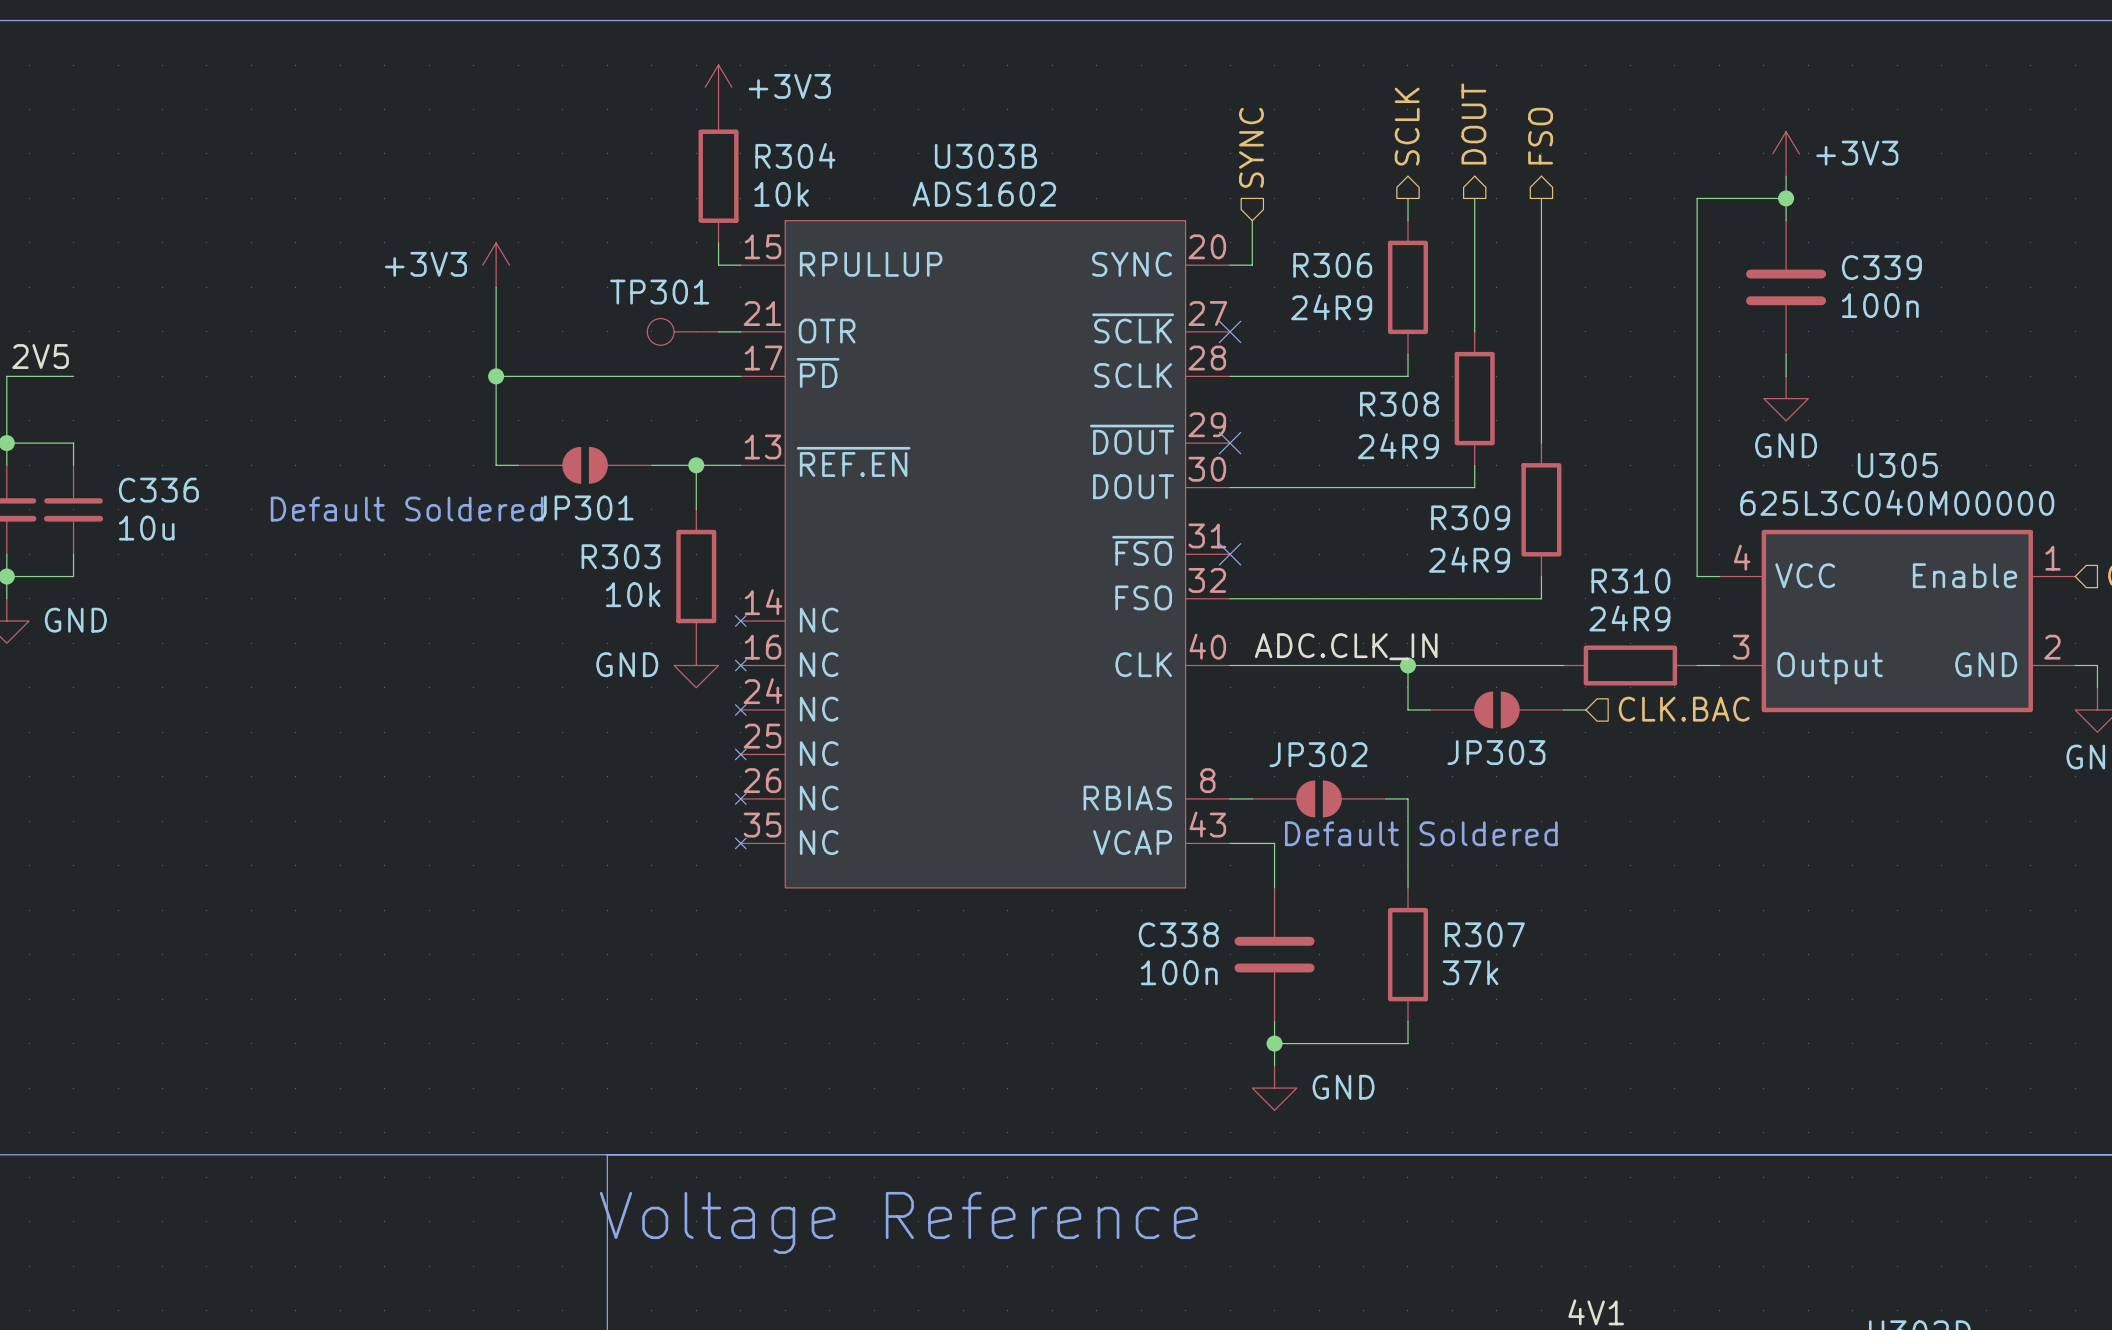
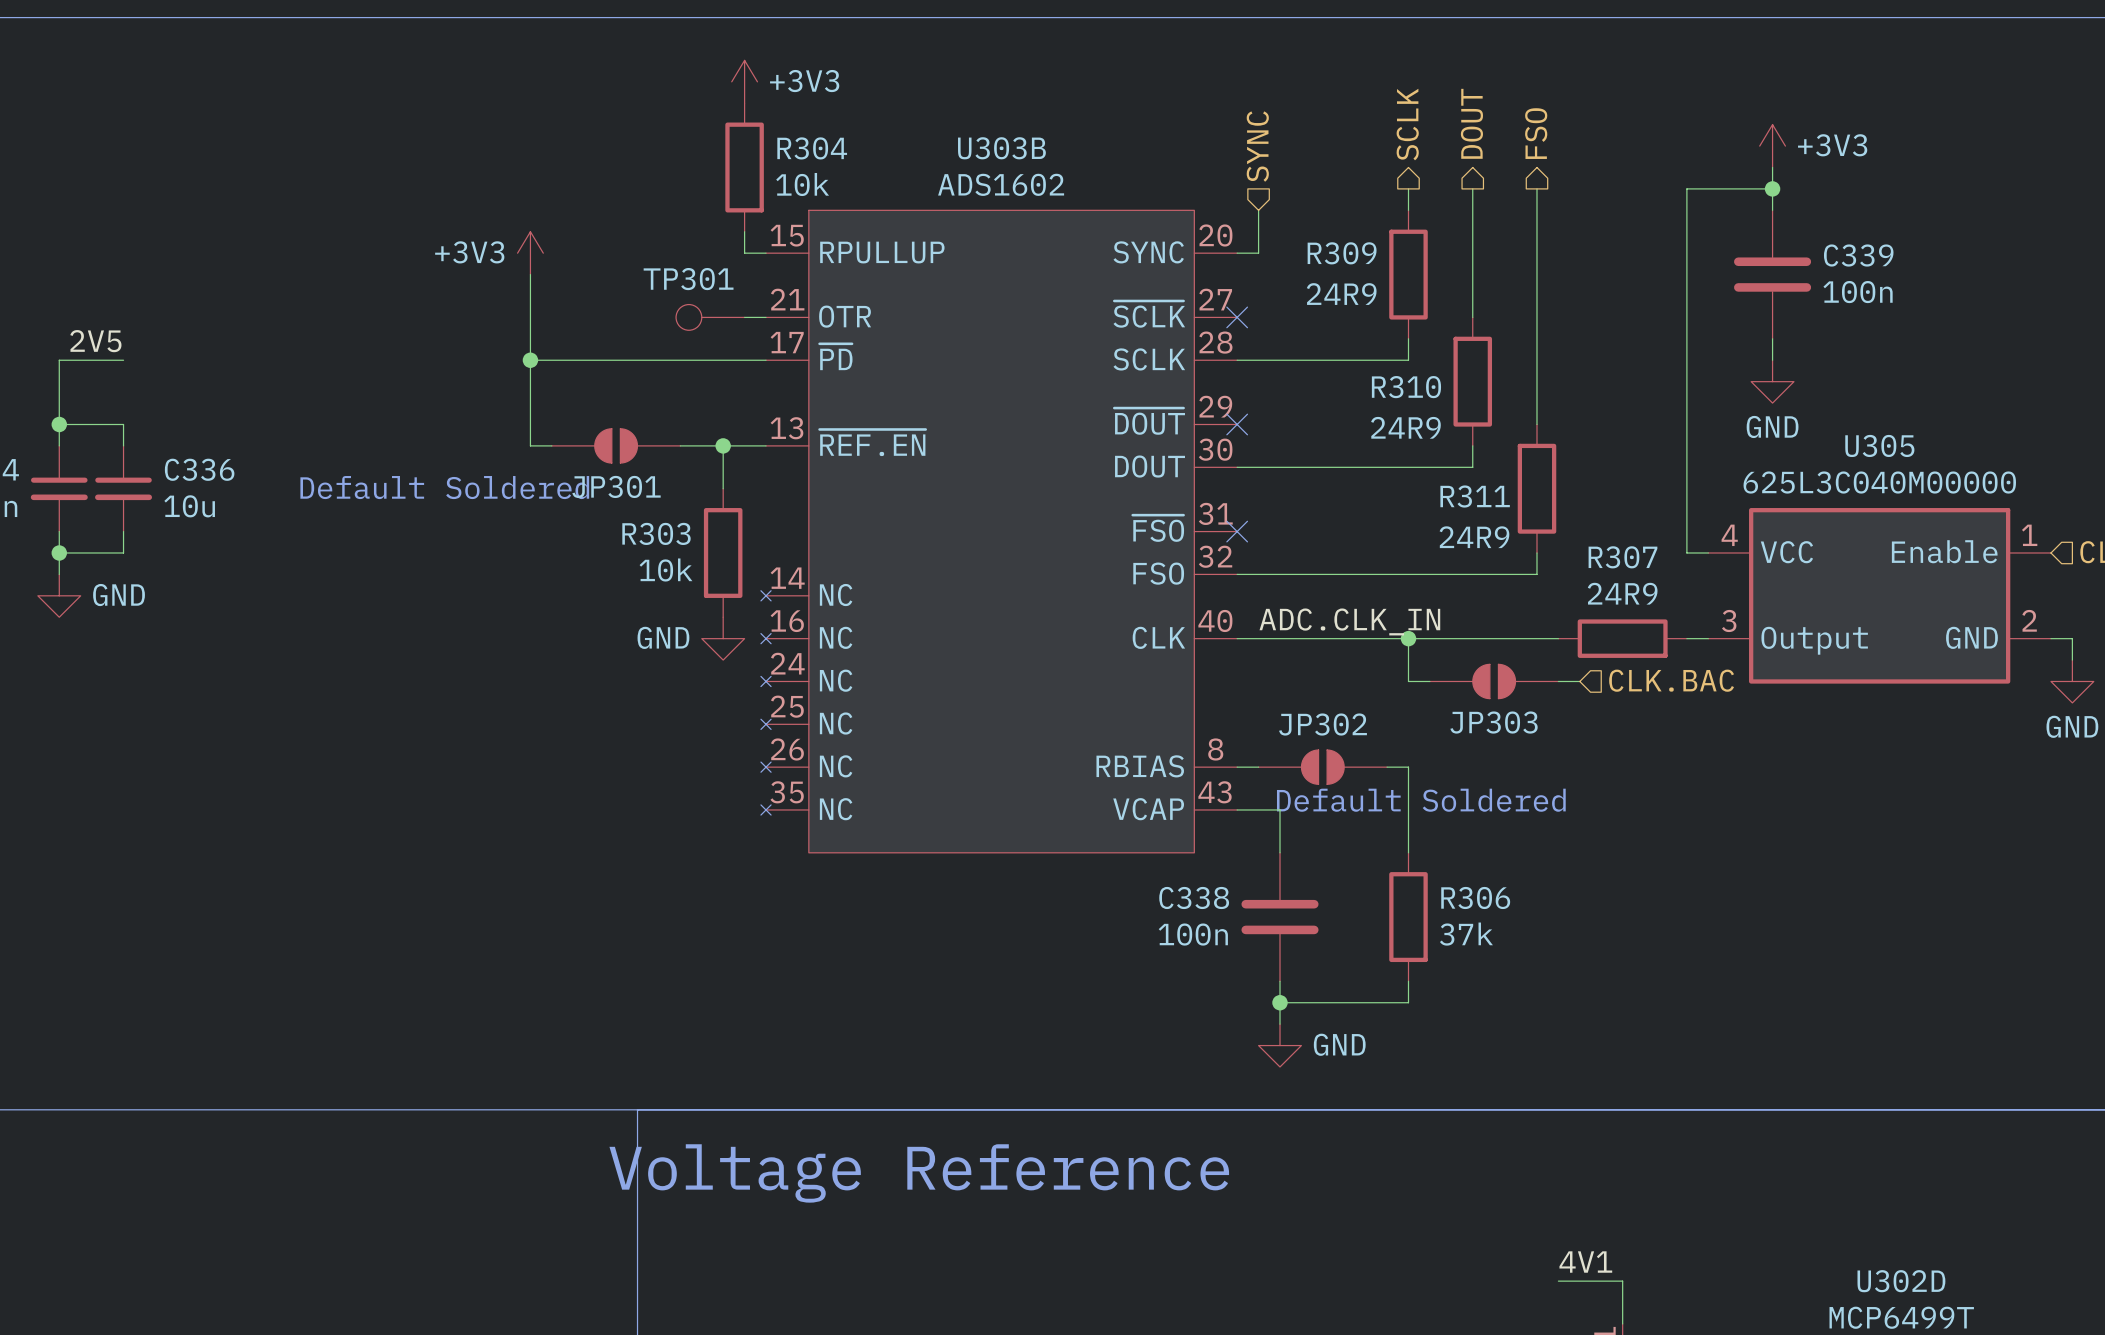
R306 name: R306 (1332, 265) -> R309 (1342, 253)
R308 name: R308 (1399, 404) -> R310 (1406, 387)
R309 name: R309 (1470, 517) -> R311 (1475, 496)
R310 name: R310 (1630, 581) -> R307 (1622, 557)
R307 name: R307 (1484, 934) -> R306 (1475, 897)

